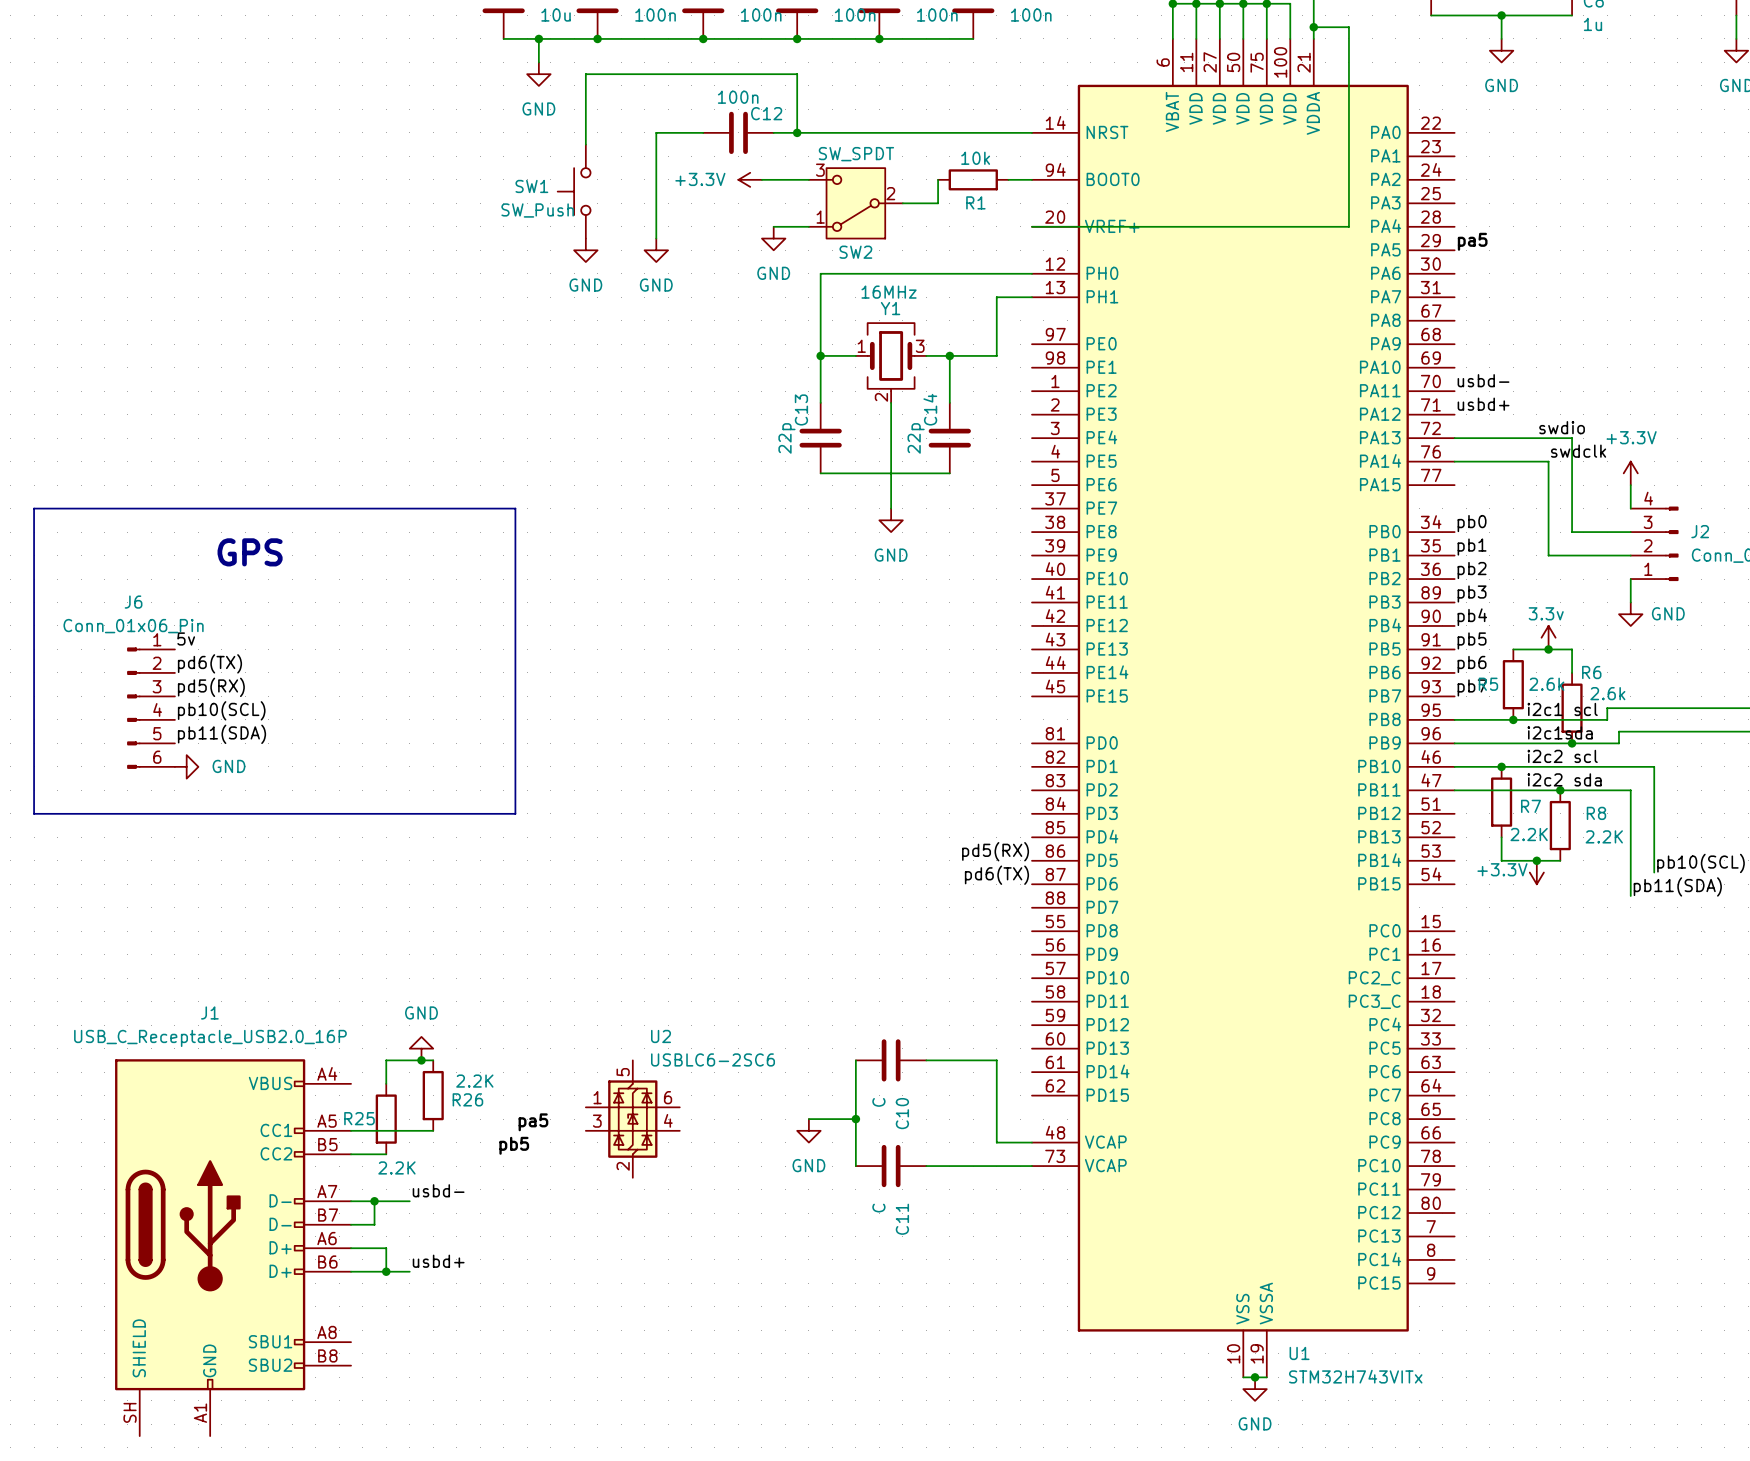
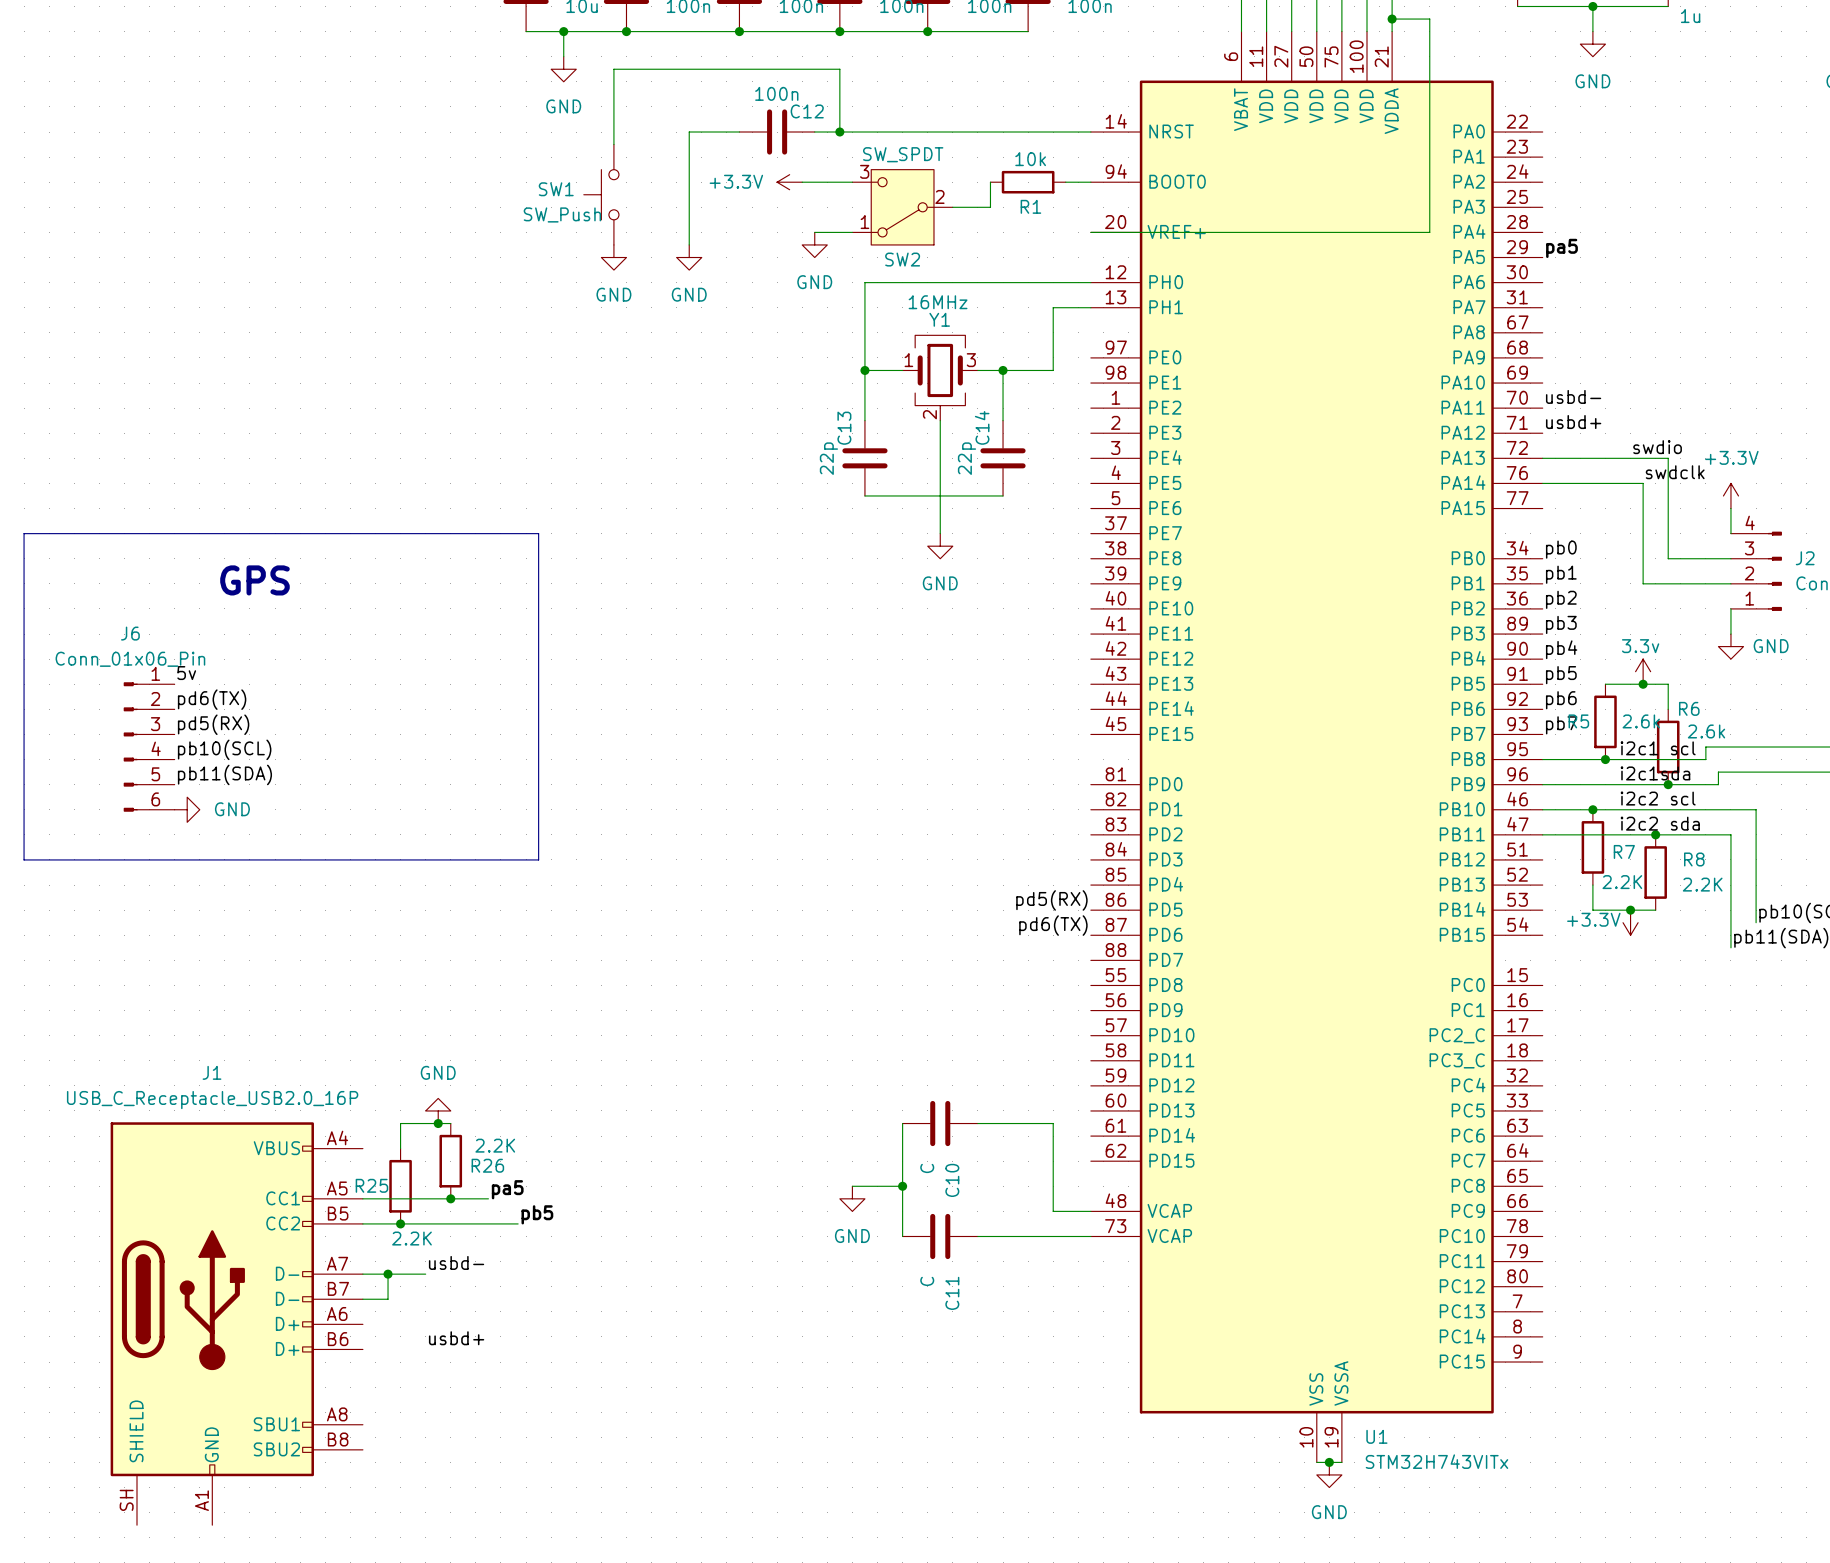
U2: USBLC6-2SC6 (632, 1119) -> none
label position: pa5 (533, 1122) -> pa5 (507, 1189)
wire: none -> (450, 1198) (488, 1198)
junction: none -> (450, 1198)
wire: none -> (400, 1223) (518, 1223)
junction: none -> (400, 1223)
wire: (351, 1248) (386, 1248) (386, 1271) -> none
wire: (351, 1271) (409, 1271) -> none
junction: (386, 1271) -> none

